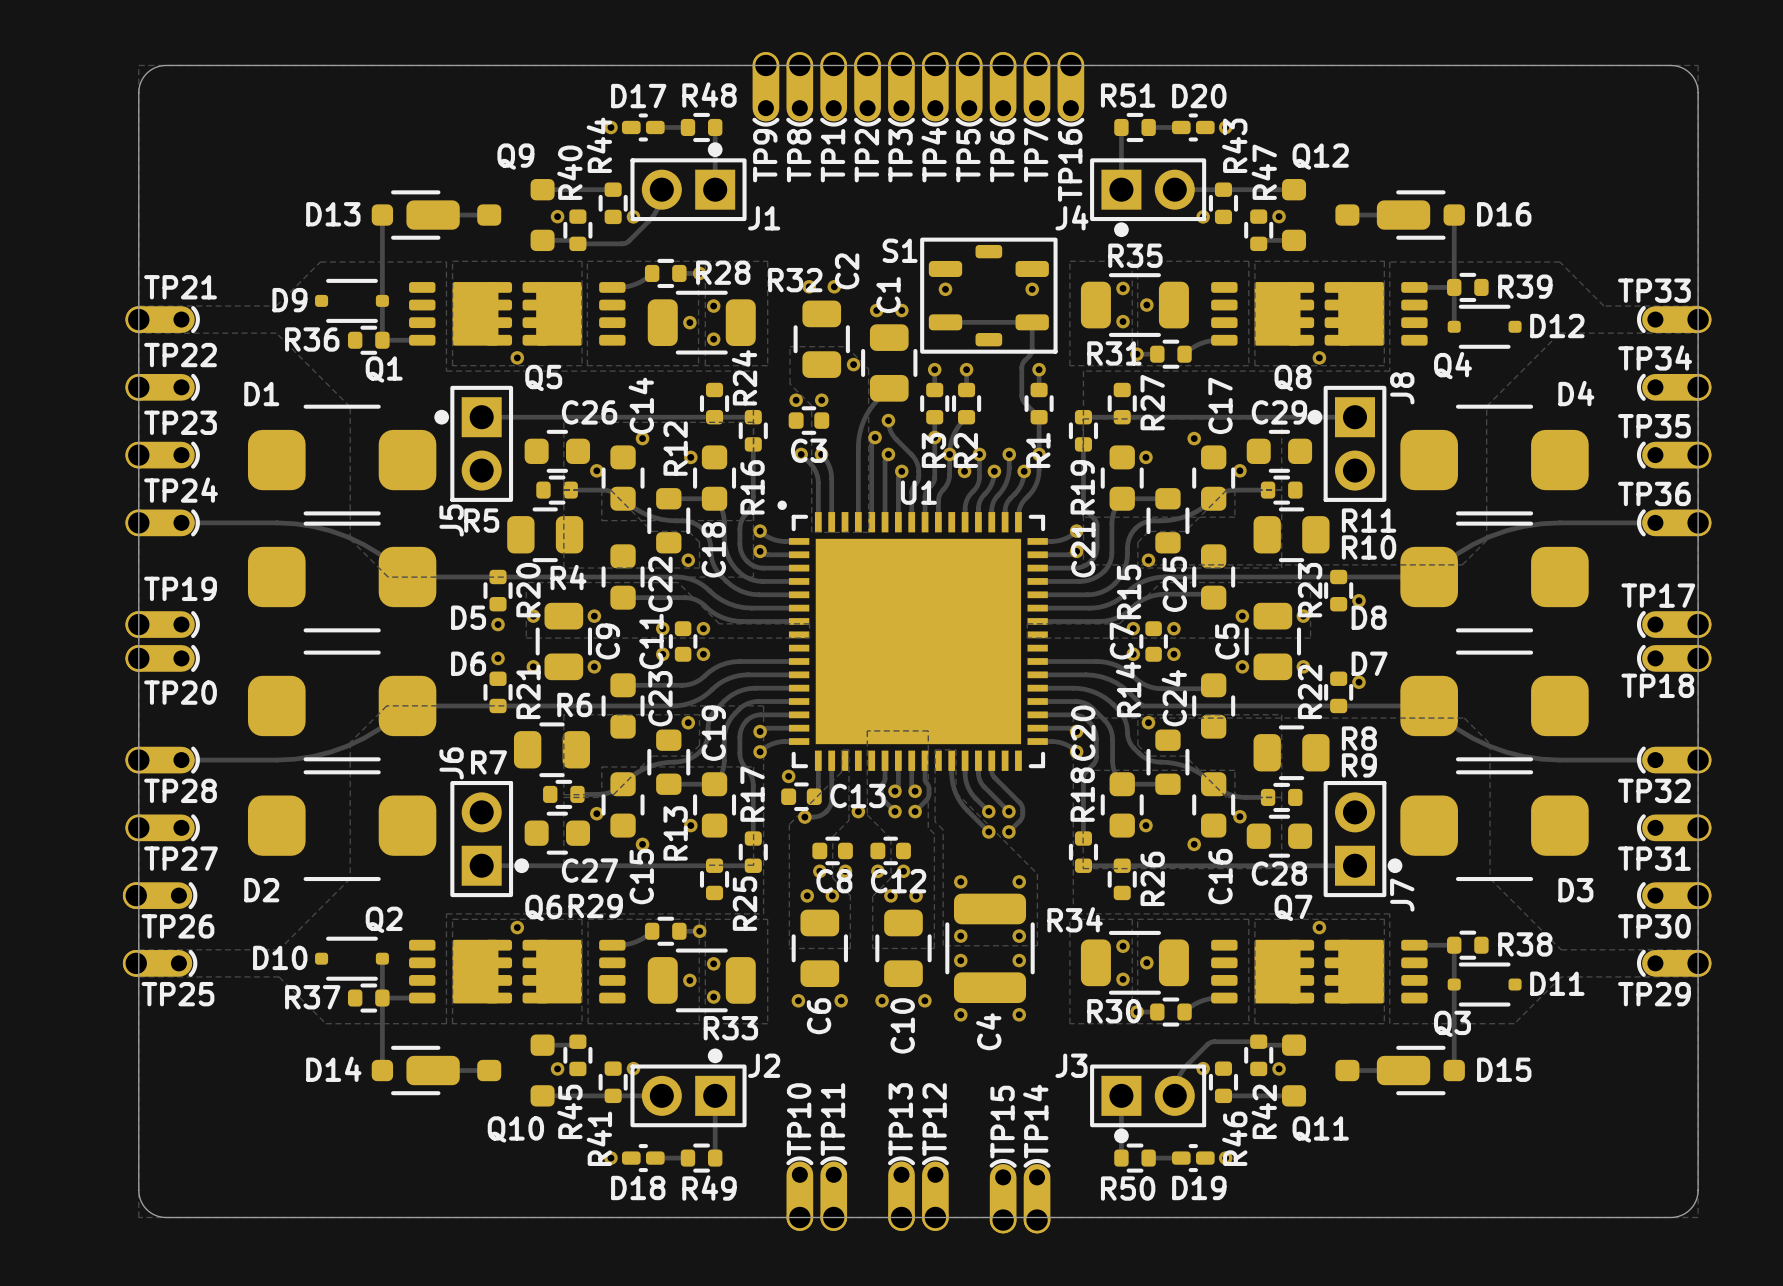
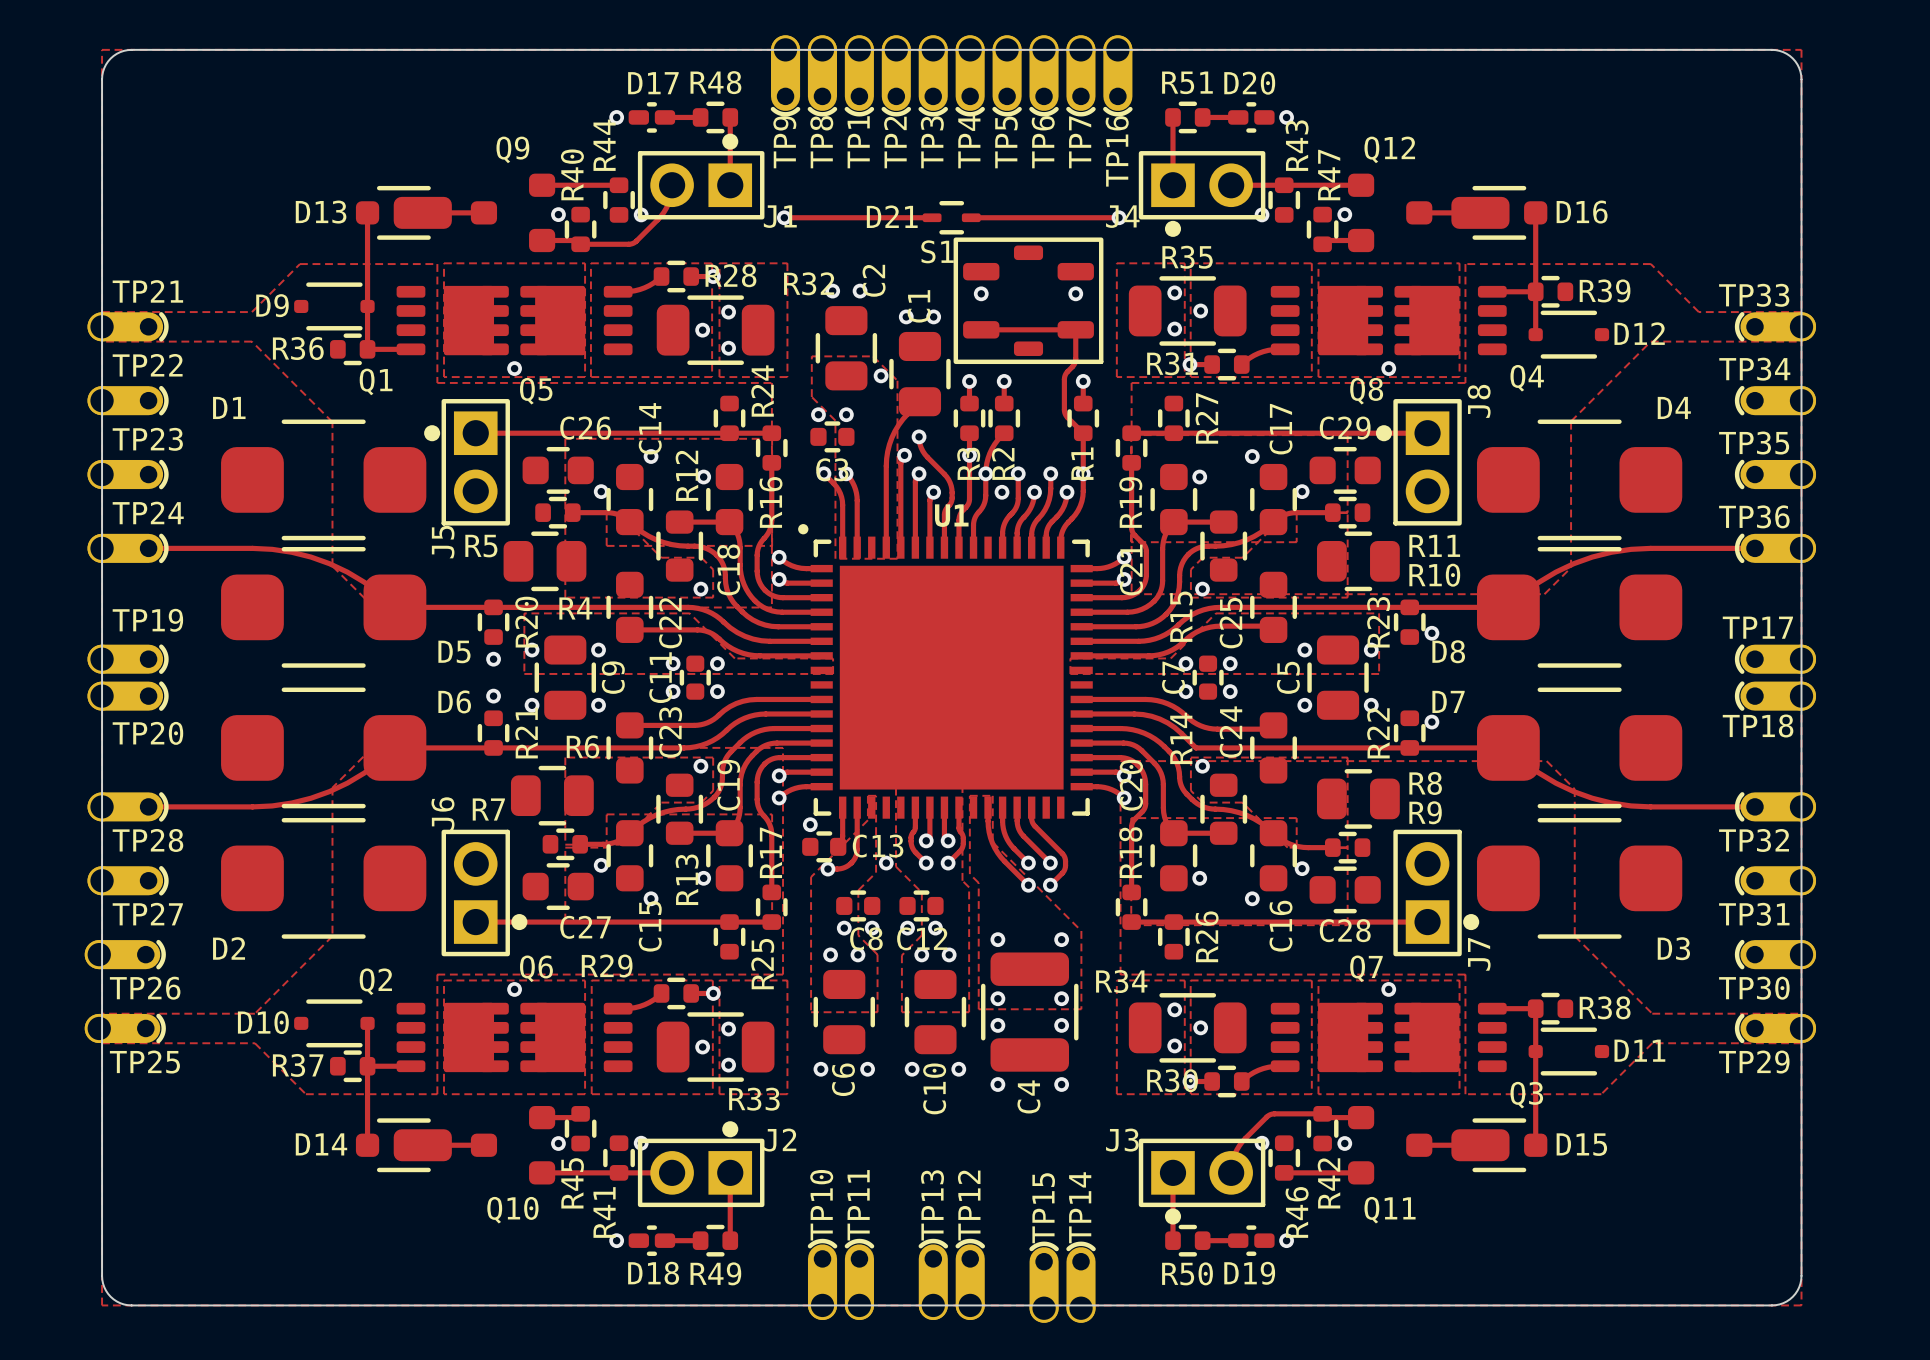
track: none -> (784, 217) (932, 217)
via: none -> (784, 217)
D21: none -> (951, 217)
track: none -> (971, 217) (1119, 217)
via: none -> (1119, 217)

